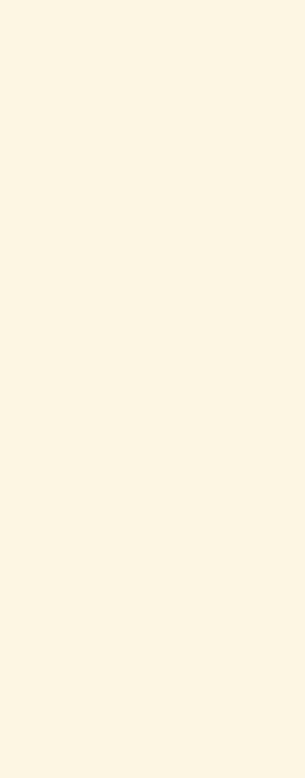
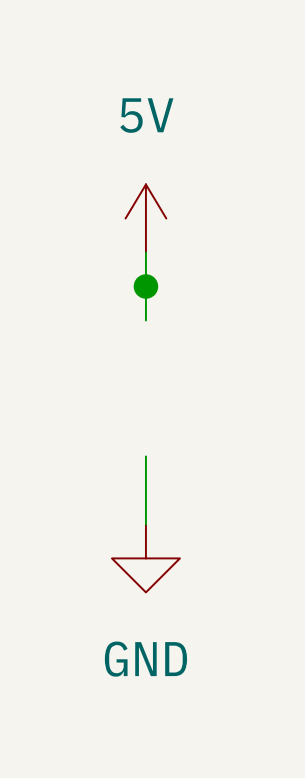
power symbol: none -> 5V (145, 218)
wire: none -> (145, 252) (145, 320)
junction: none -> (145, 286)
wire: none -> (145, 456) (145, 524)
power symbol: none -> GND (145, 558)

